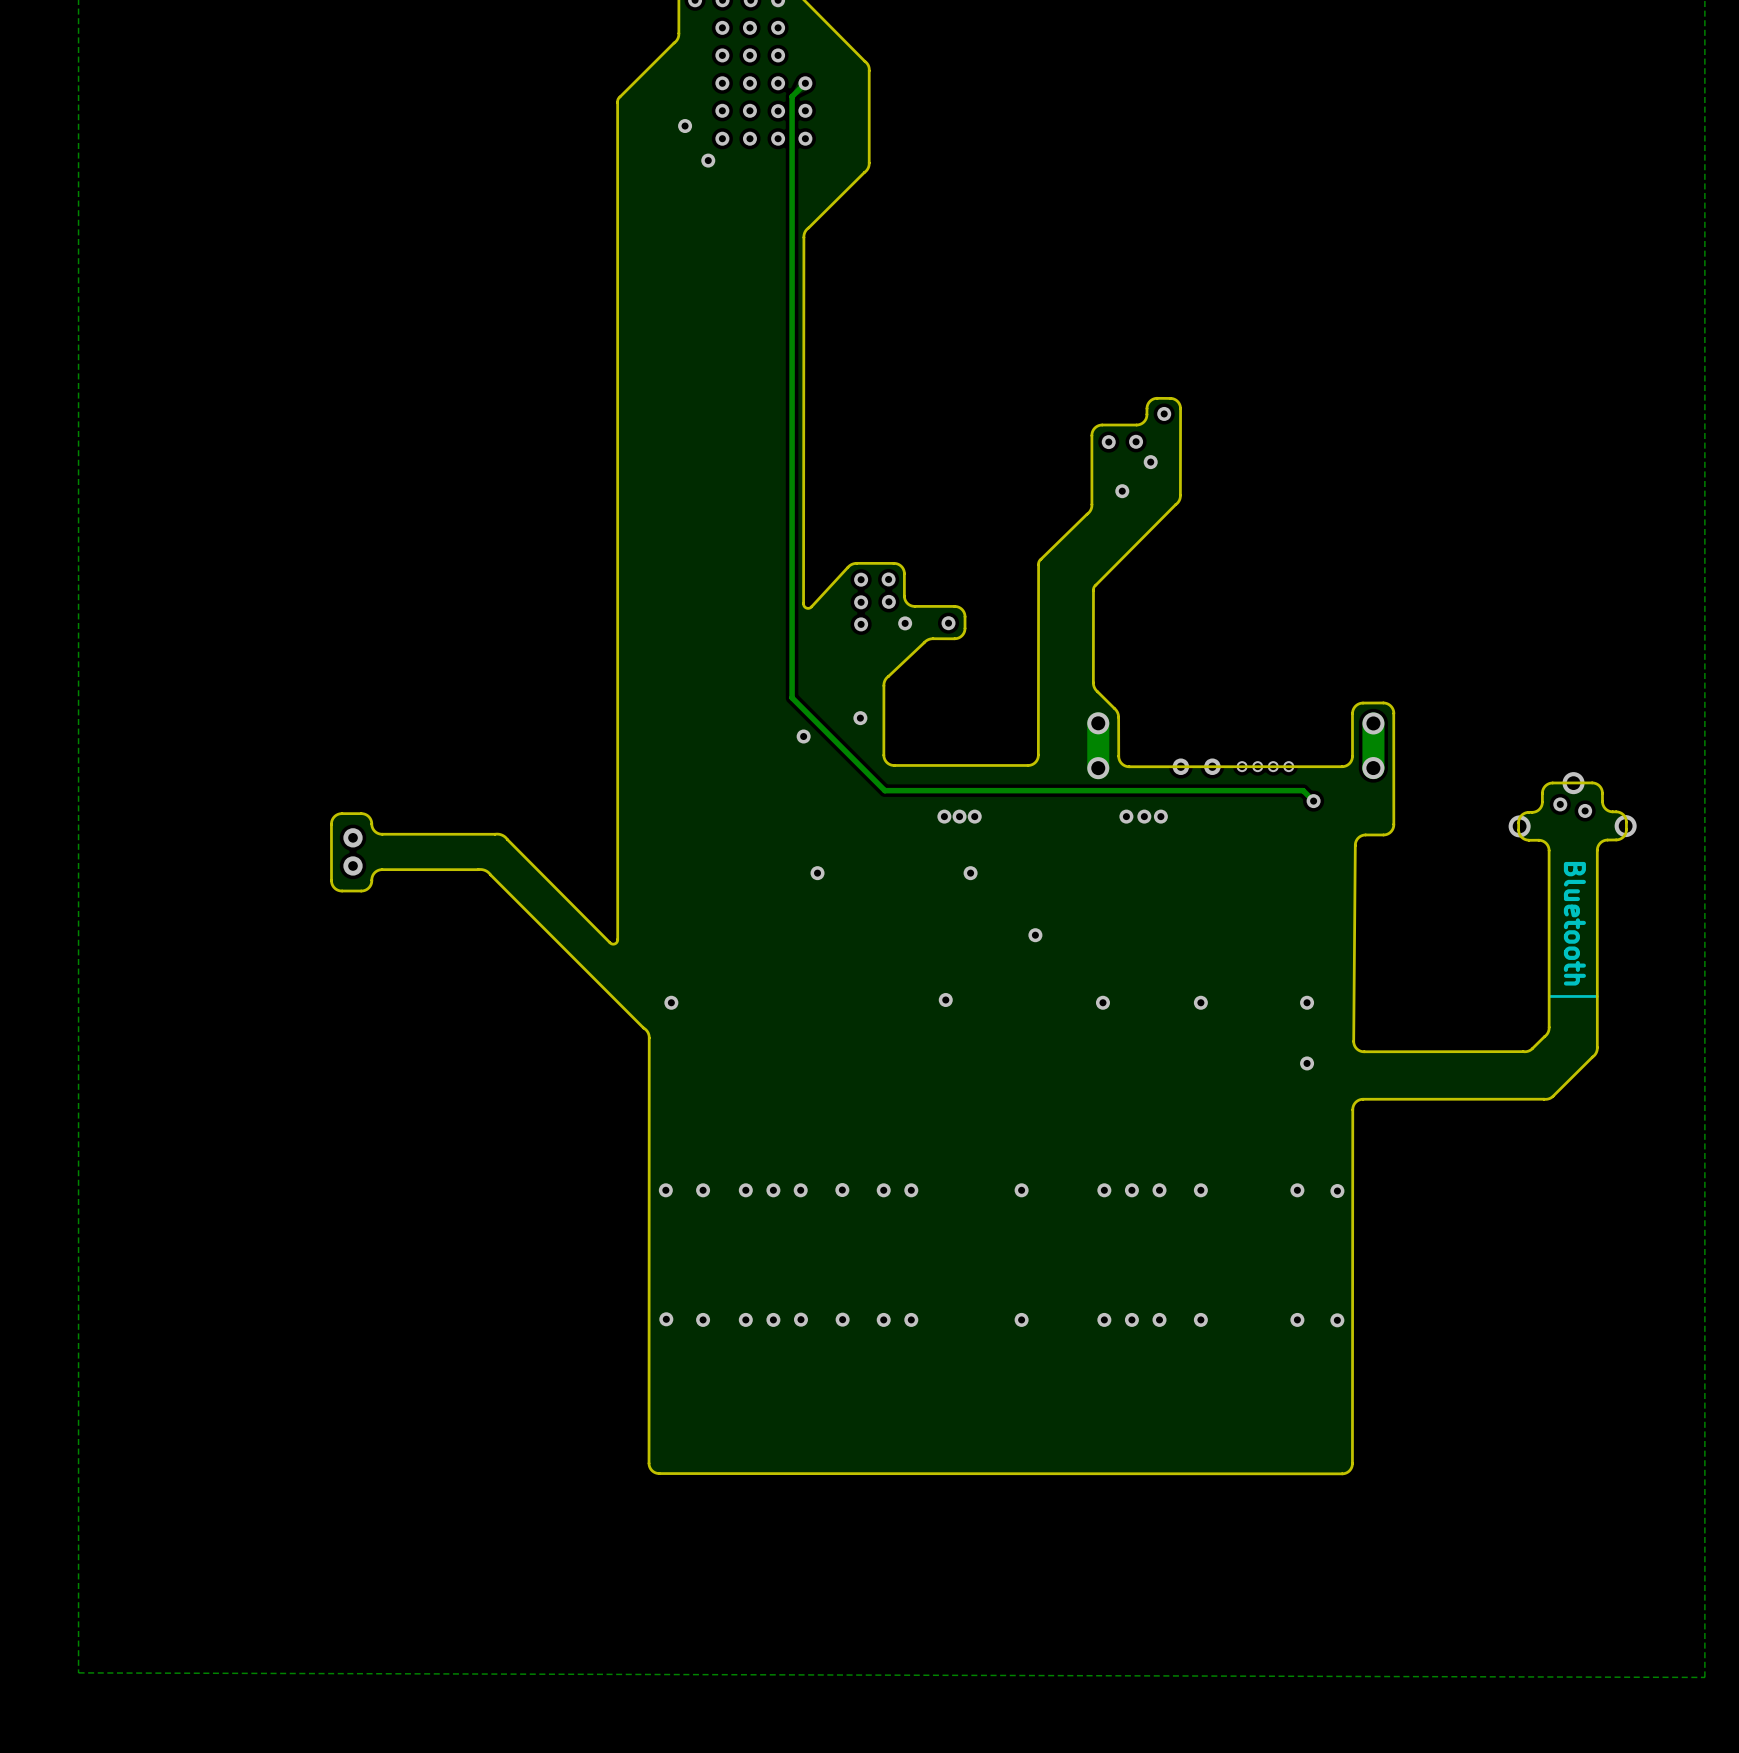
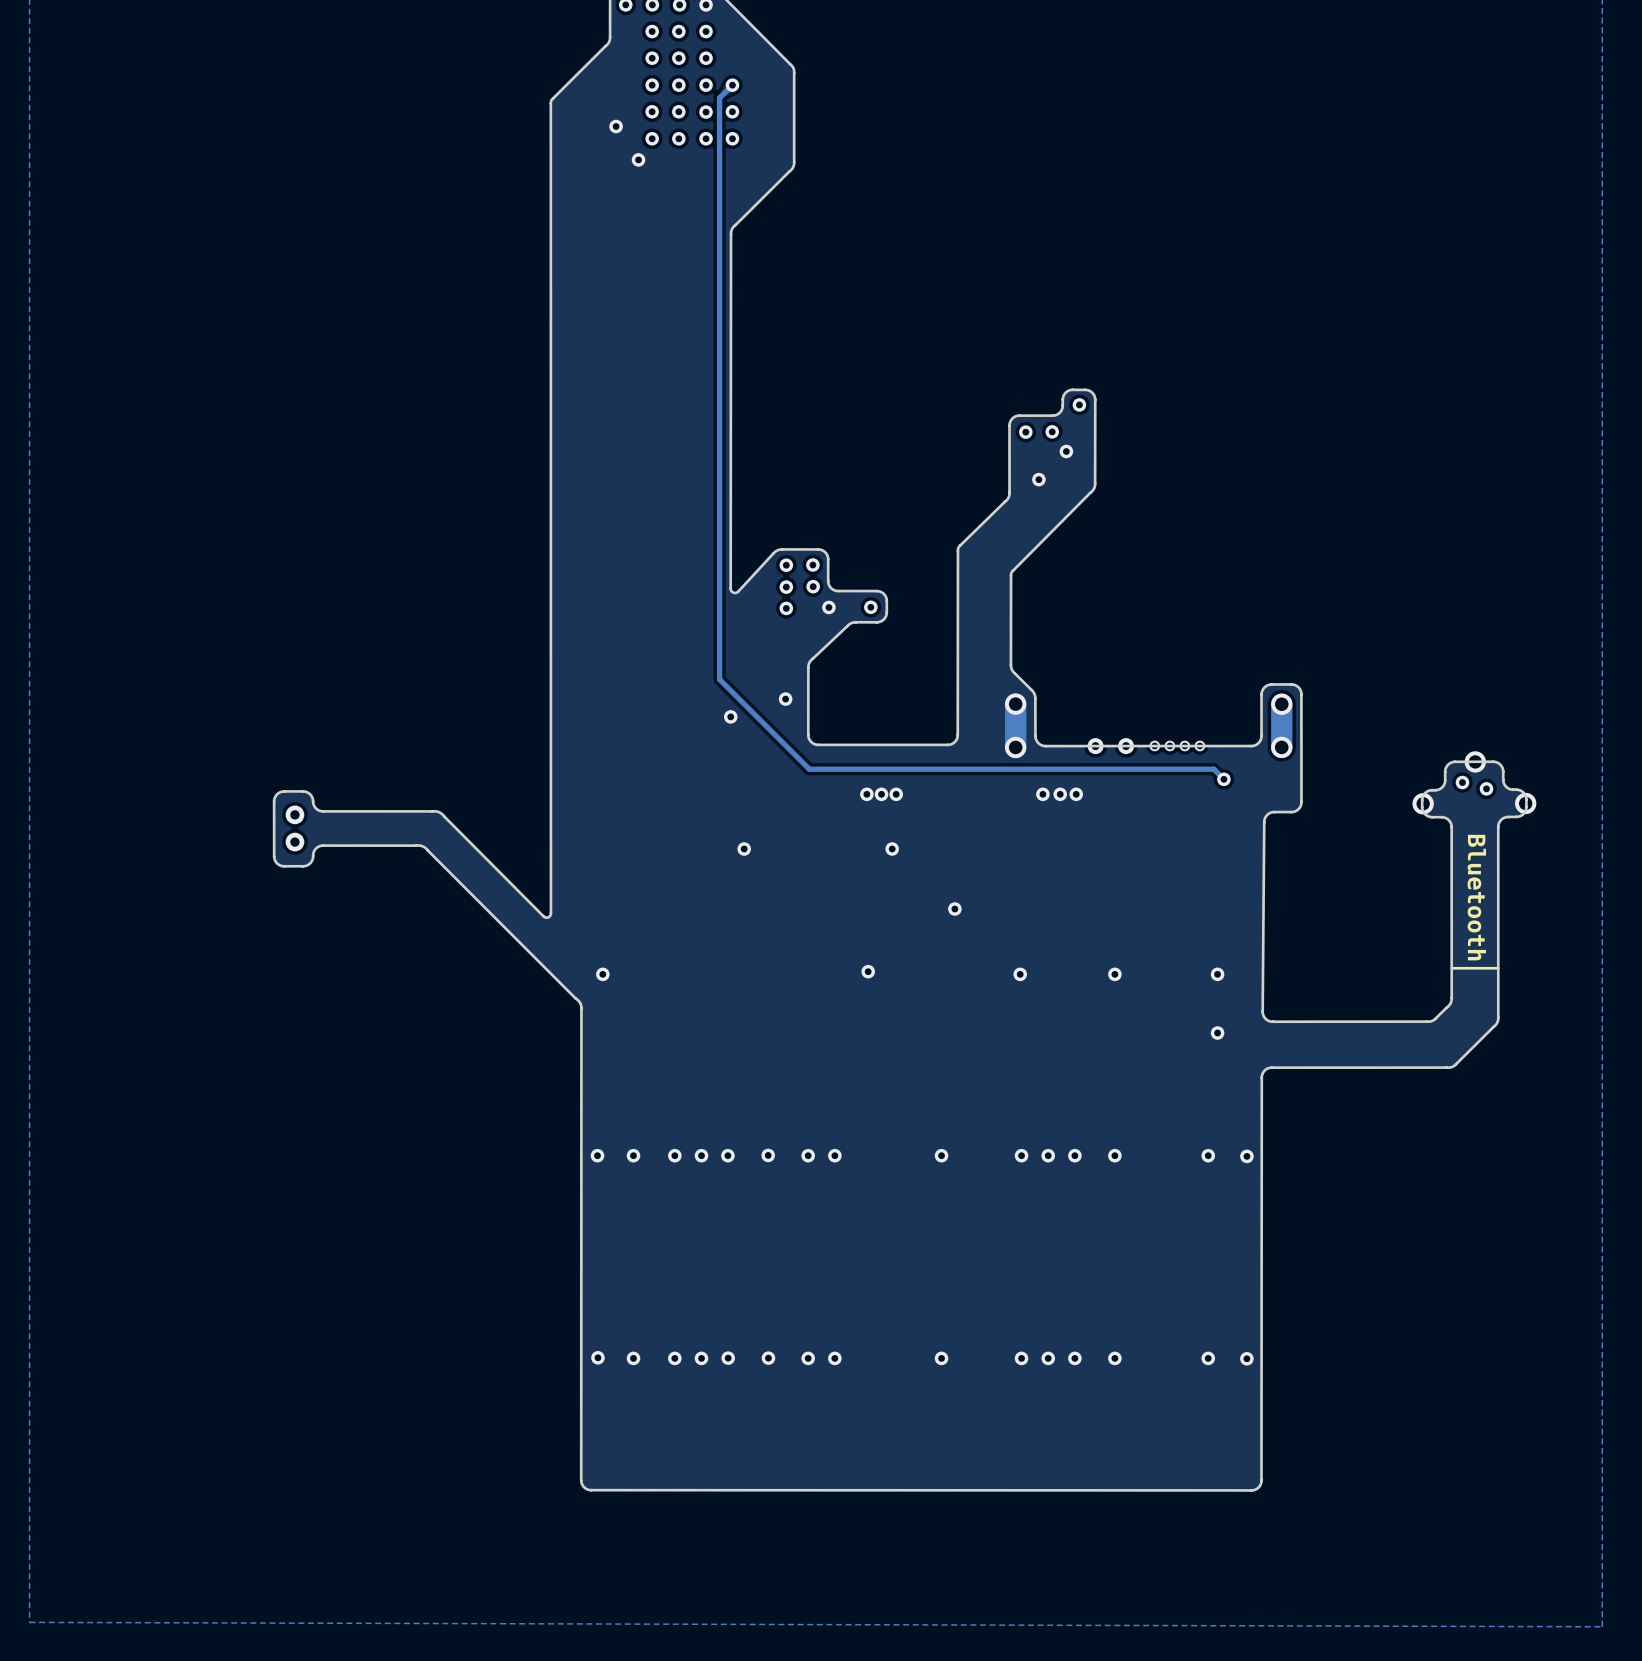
board edge: (649, 1038) (649, 1463) (651, 1469) (658, 1473) (1346, 1472) (1350, 1469) (1352, 1463) (1352, 1109) -> (581, 1008) (581, 1480) (583, 1486) (590, 1490) (1251, 1490) (1256, 1488) (1261, 1480) (1261, 1077)
via: (666, 1319) -> none
via: (703, 1319) -> none
via: (745, 1319) -> none
via: (773, 1319) -> none
via: (800, 1319) -> none
via: (842, 1319) -> none
via: (883, 1319) -> none
via: (911, 1319) -> none
via: (1021, 1319) -> none
via: (1104, 1319) -> none
via: (1131, 1319) -> none
via: (1159, 1319) -> none
via: (1200, 1319) -> none
via: (1297, 1319) -> none
via: (1337, 1320) -> none
via: none -> (597, 1357)
via: none -> (633, 1358)
via: none -> (674, 1358)
via: none -> (701, 1358)
via: none -> (728, 1358)
via: none -> (768, 1358)
via: none -> (808, 1358)
via: none -> (834, 1358)
via: none -> (941, 1358)
via: none -> (1021, 1358)
via: none -> (1048, 1358)
via: none -> (1074, 1358)
via: none -> (1114, 1358)
via: none -> (1208, 1358)
via: none -> (1246, 1358)

